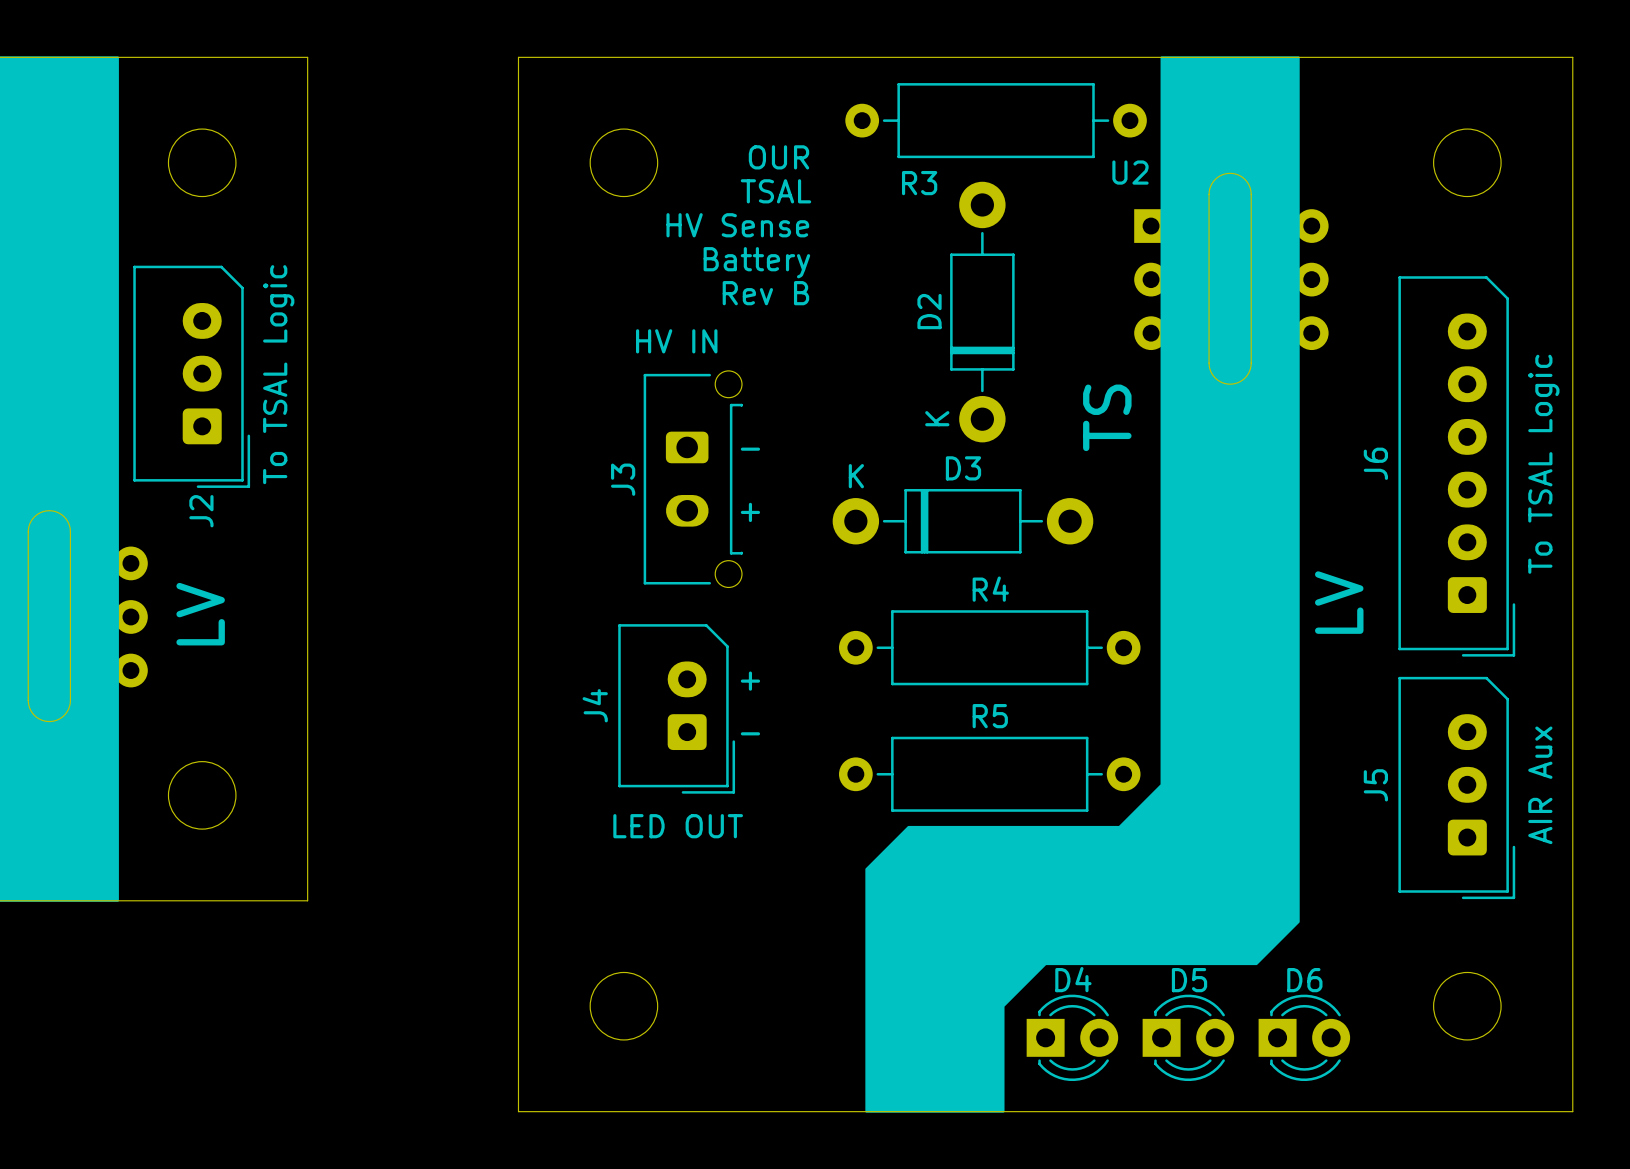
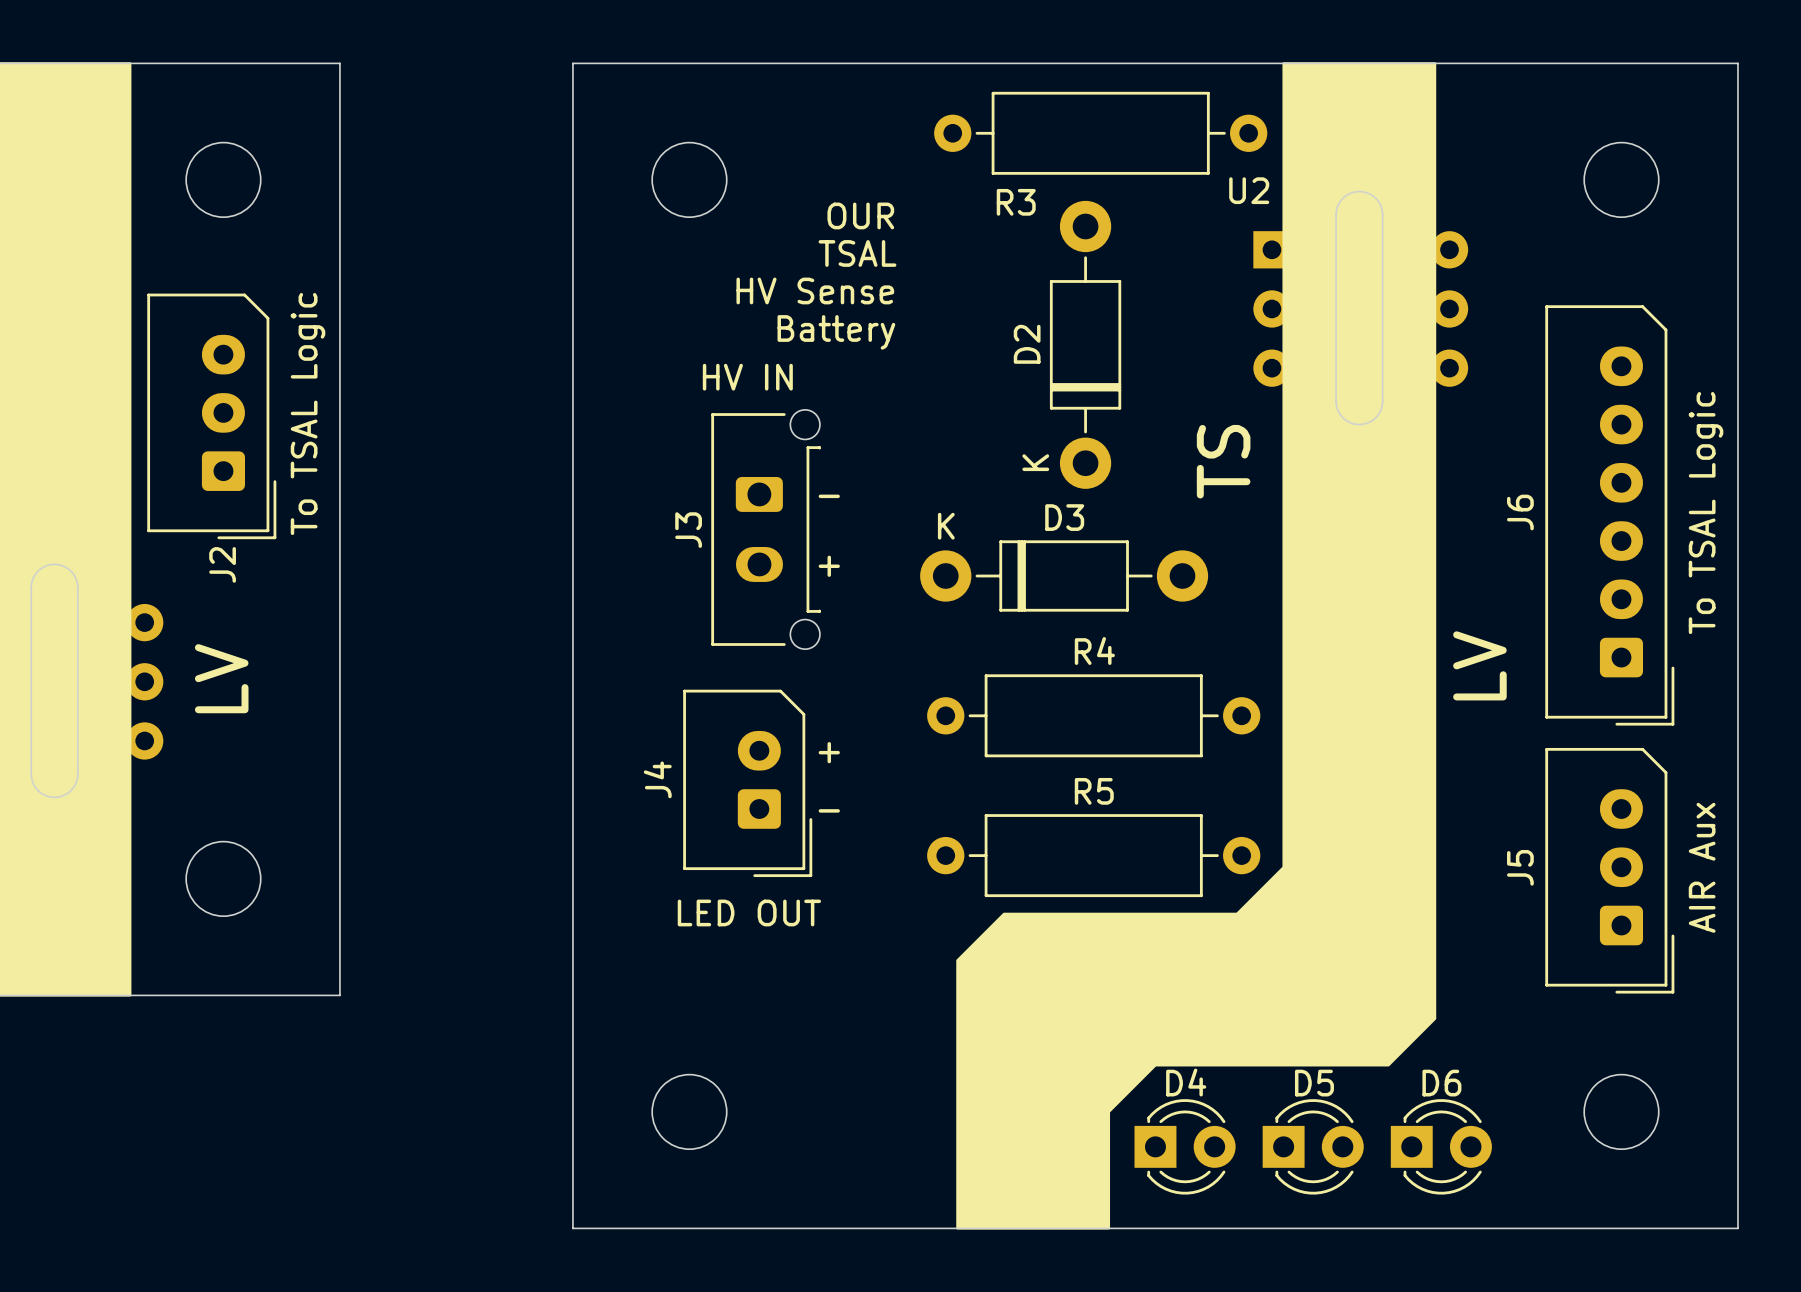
text: OUR (778, 157) -> none
text: TSAL (775, 191) -> OUR (860, 215)
text: HV Sense (737, 225) -> TSAL (857, 253)
text: Battery (756, 262) -> HV Sense (815, 290)
text: Rev B (765, 293) -> Battery (836, 332)

